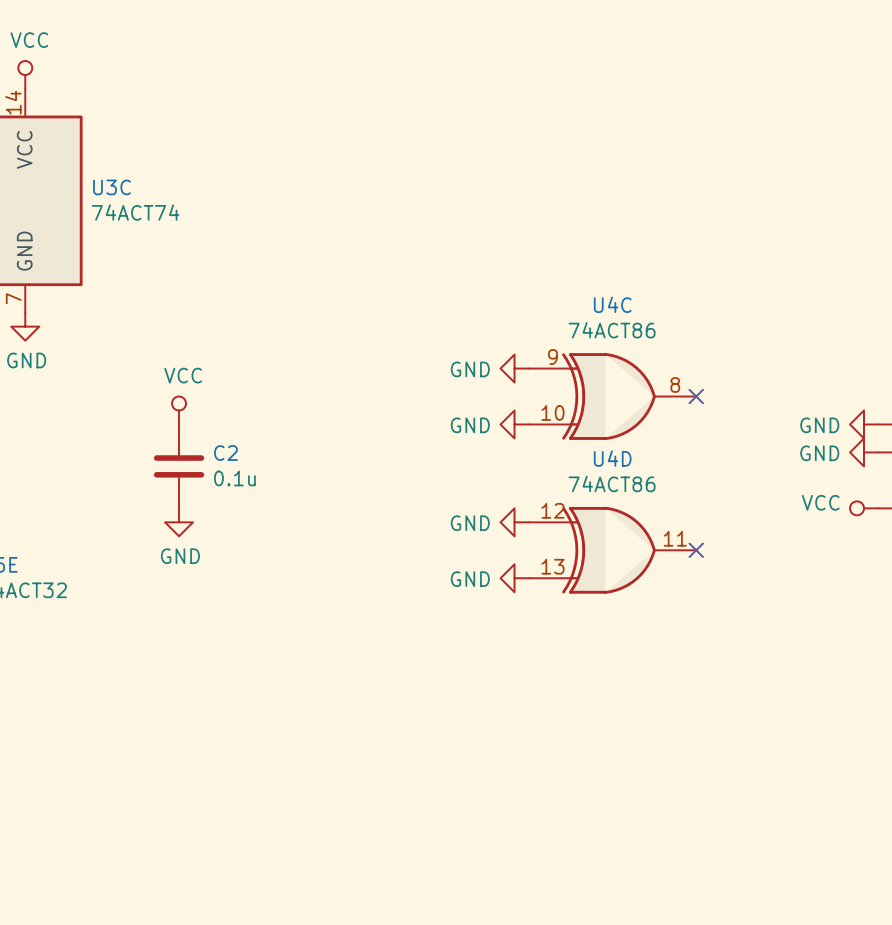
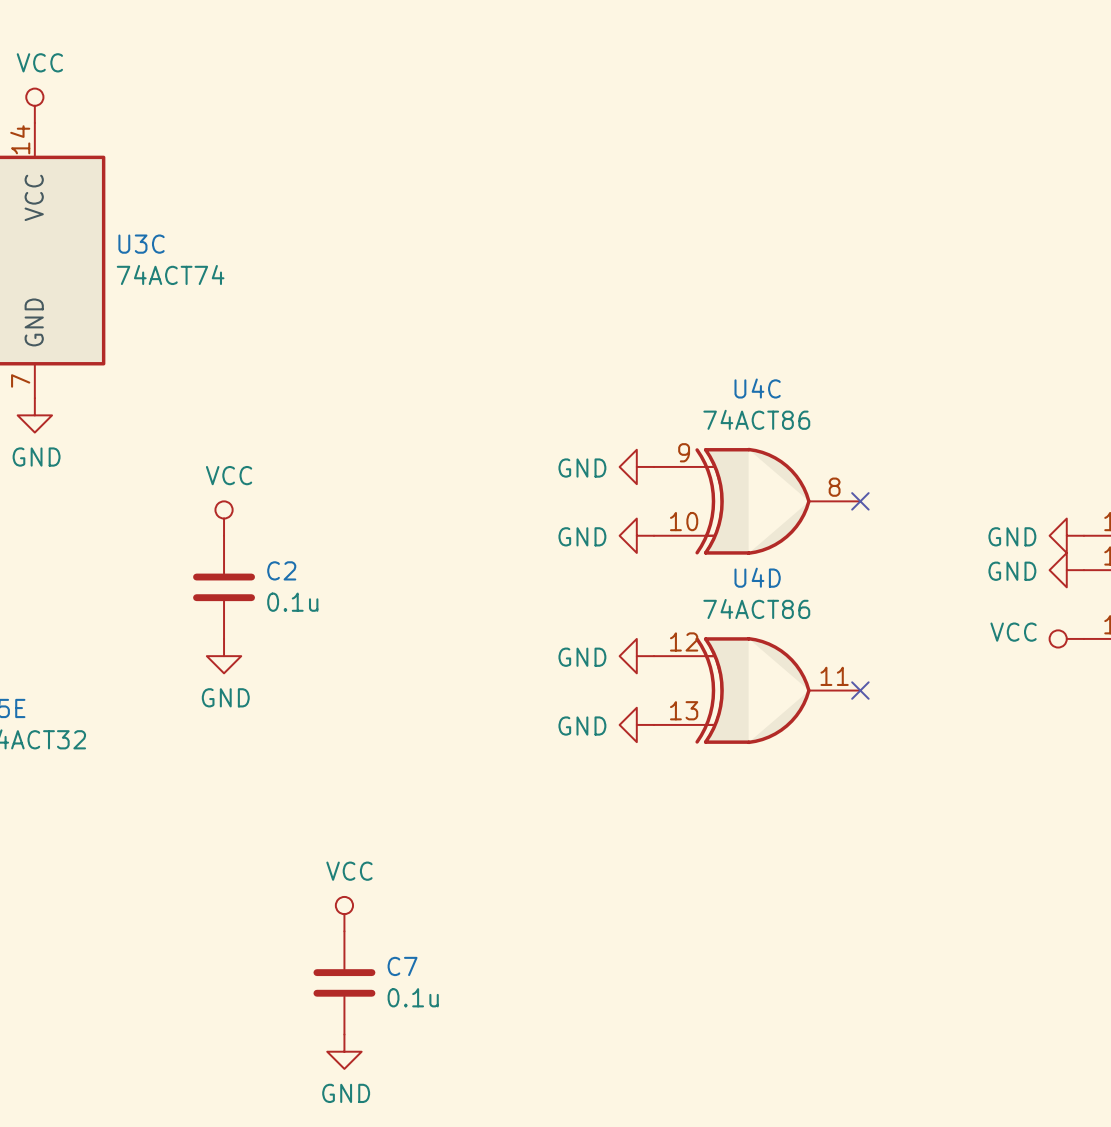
power symbol: none -> VCC (344, 914)
C7: none -> 0.1u (344, 982)
power symbol: none -> GND (344, 1051)

